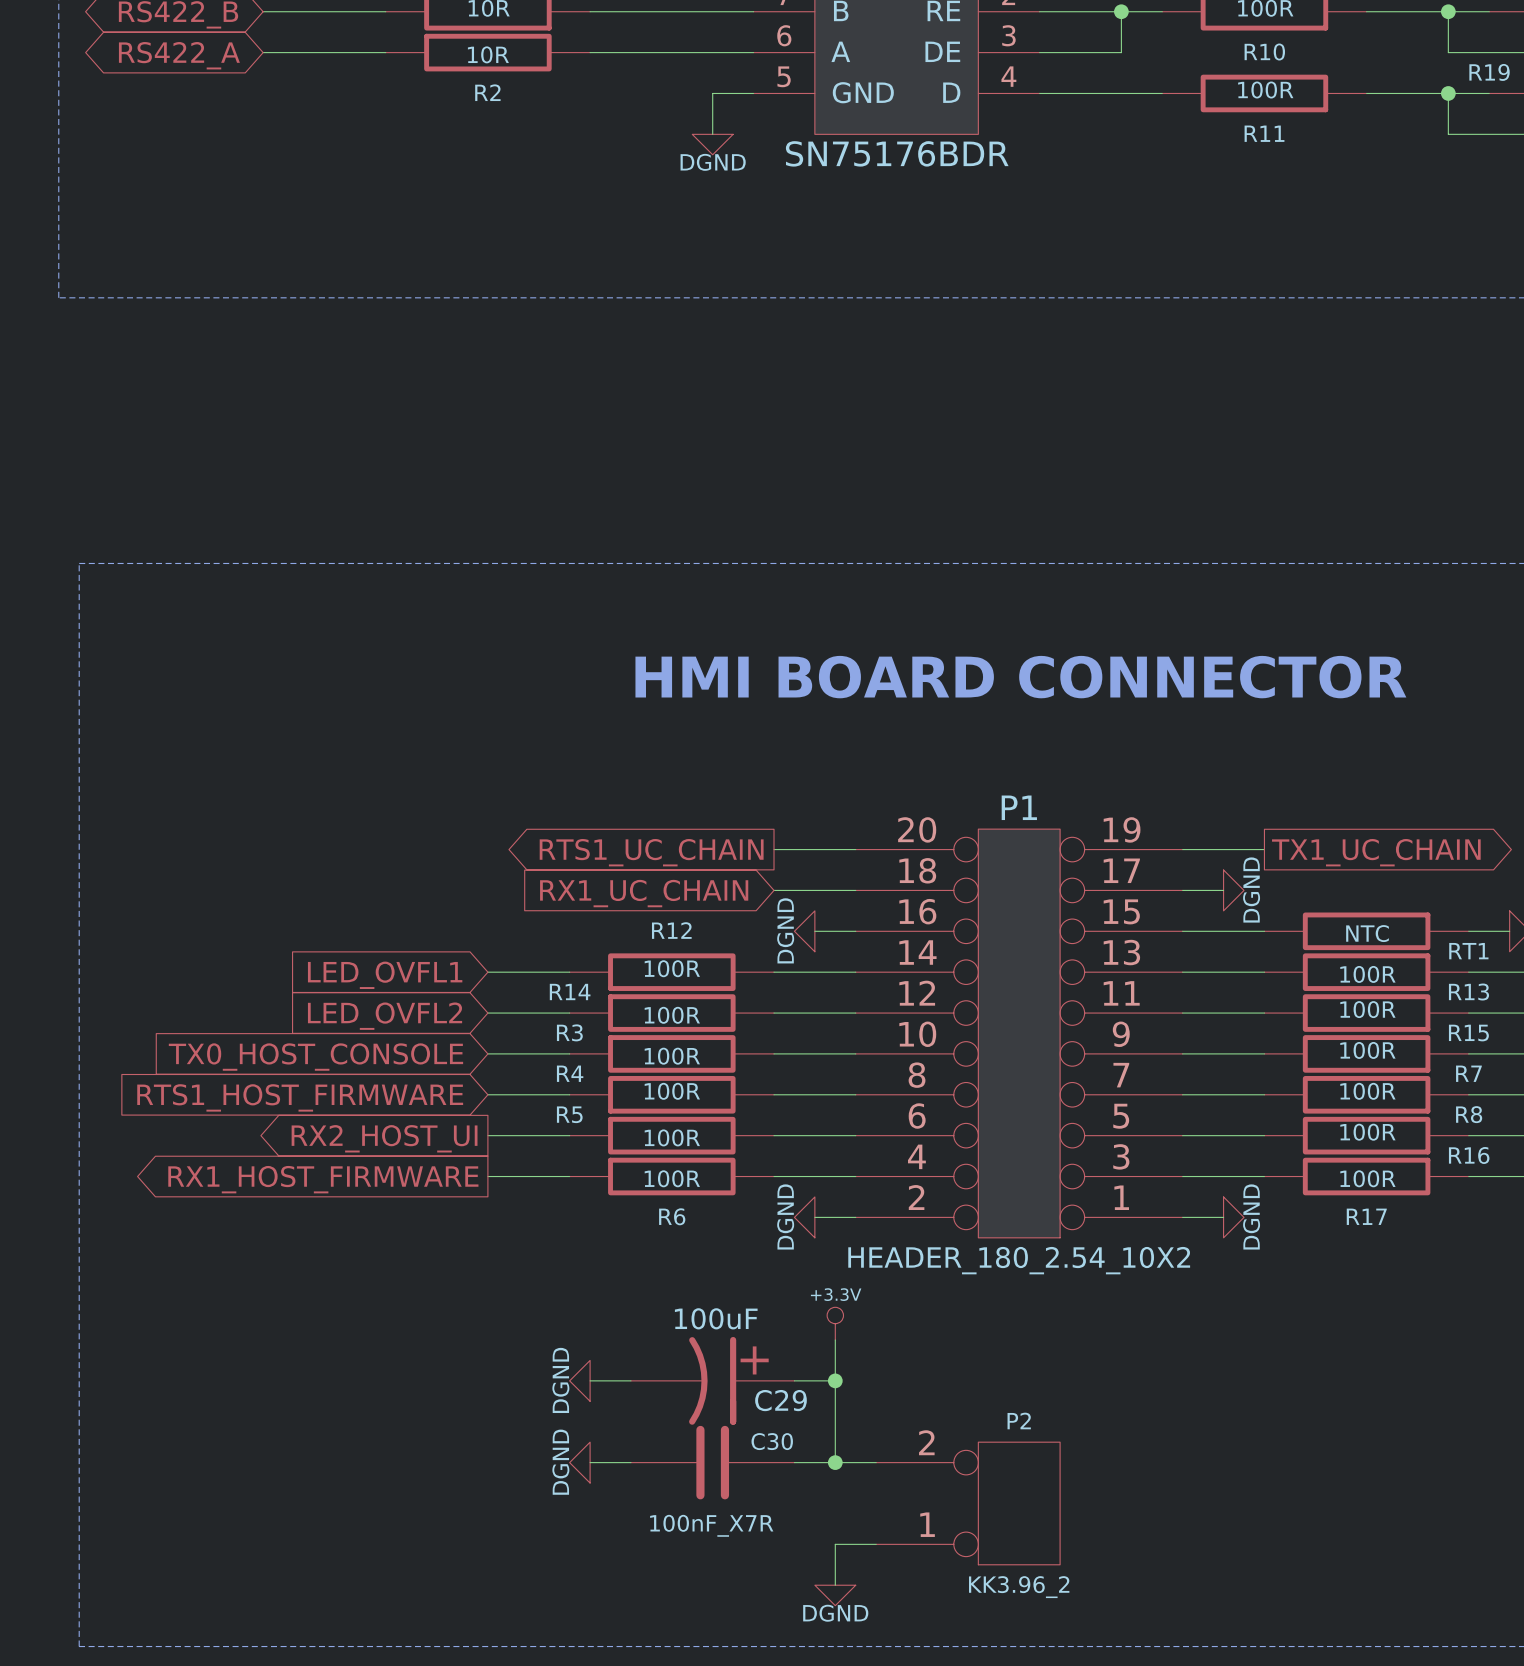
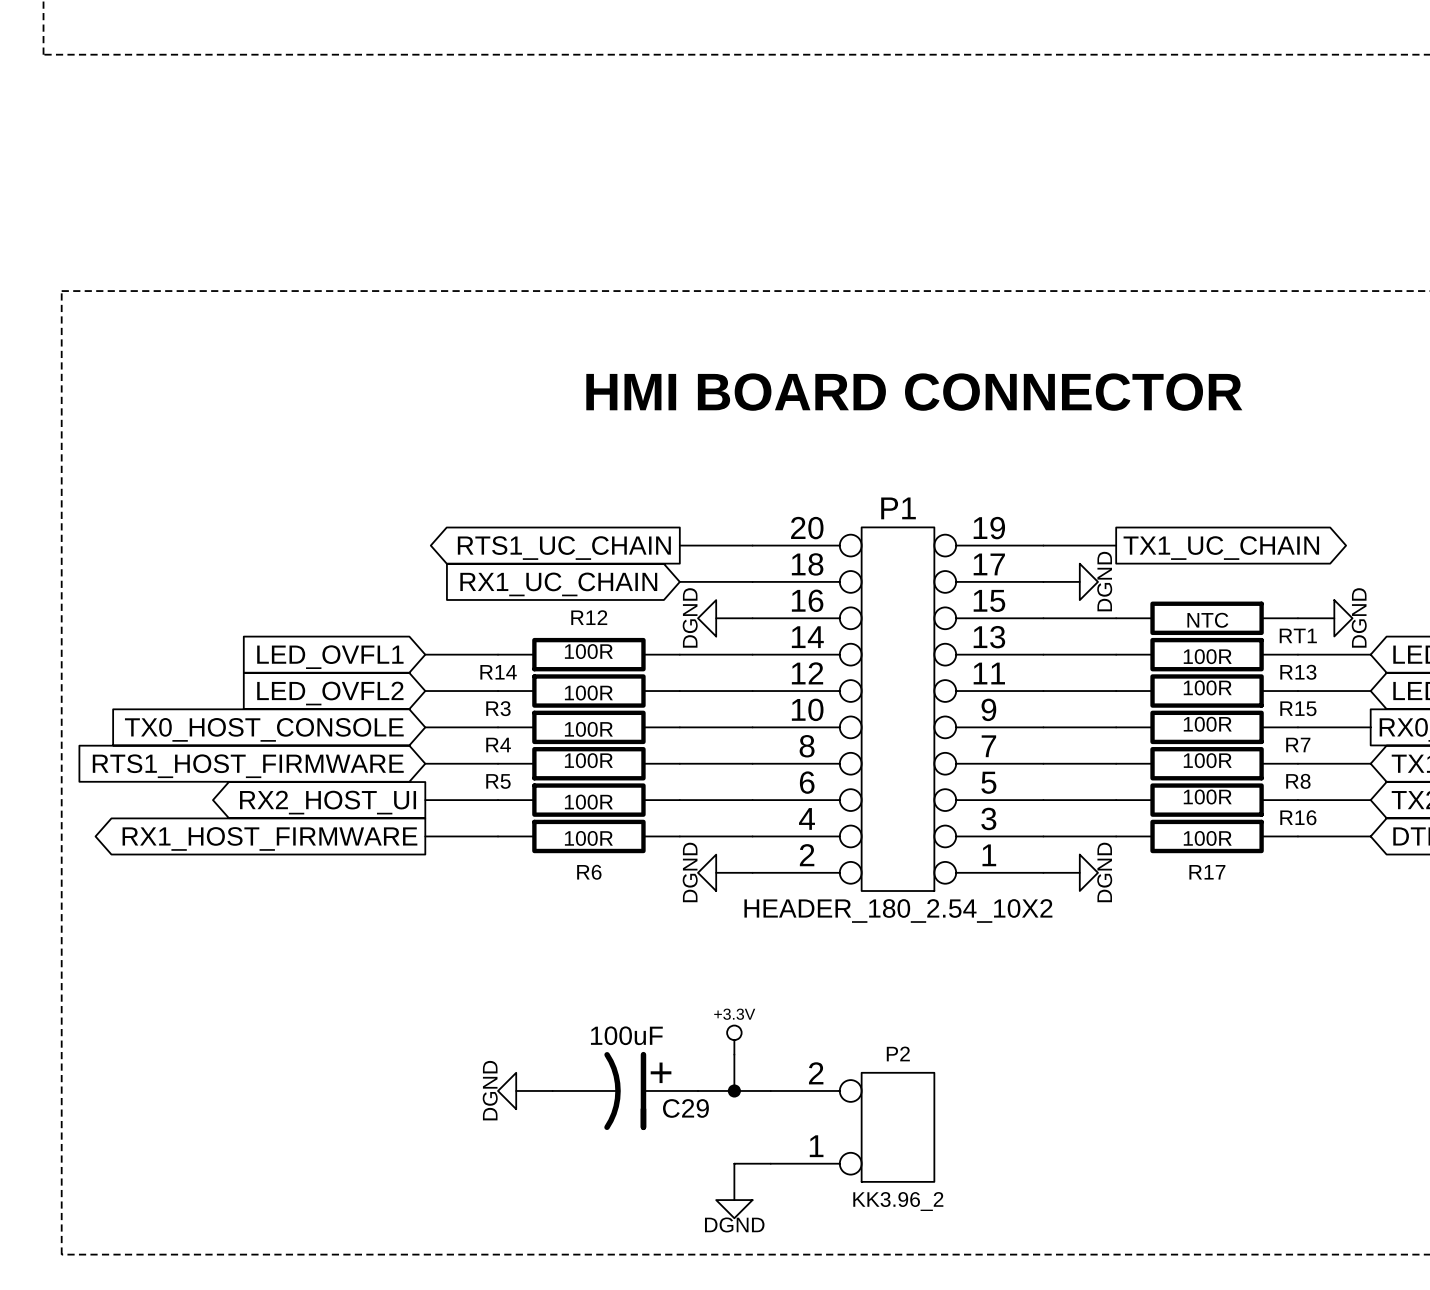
power symbol position: +3.3V (835, 1323) -> +3.3V (734, 1040)
wire: (835, 1340) (835, 1421) -> none
power symbol: DGND (579, 1380) -> none
wire: (590, 1380) (630, 1380) -> none
C29 position: (712, 1380) -> (625, 1090)
wire: (794, 1380) (835, 1380) -> none
junction: (835, 1380) -> none
C30: 100nF_X7R (712, 1462) -> none

